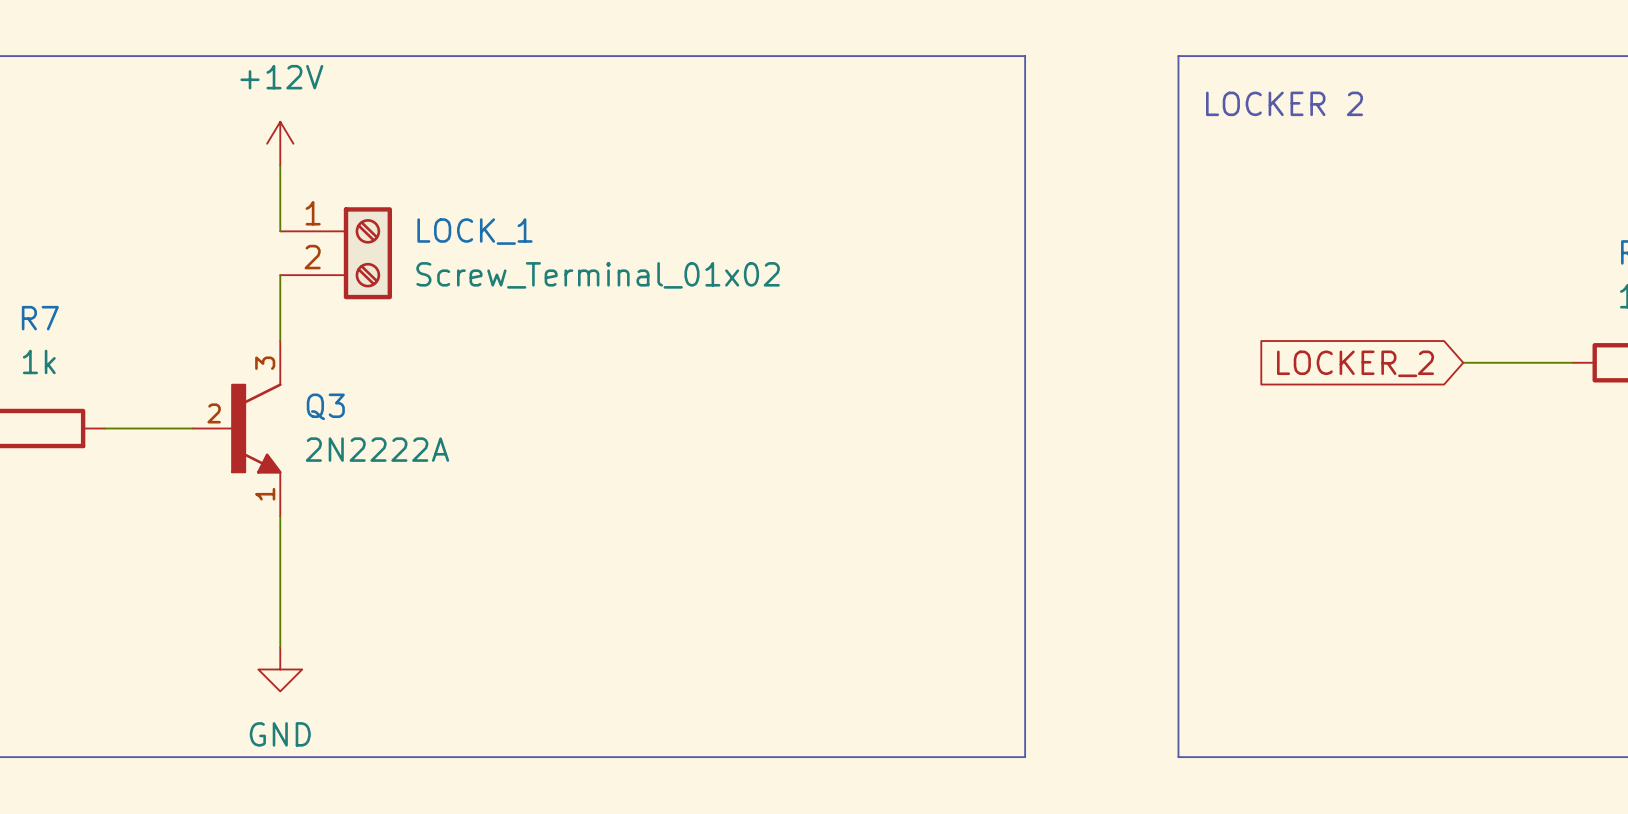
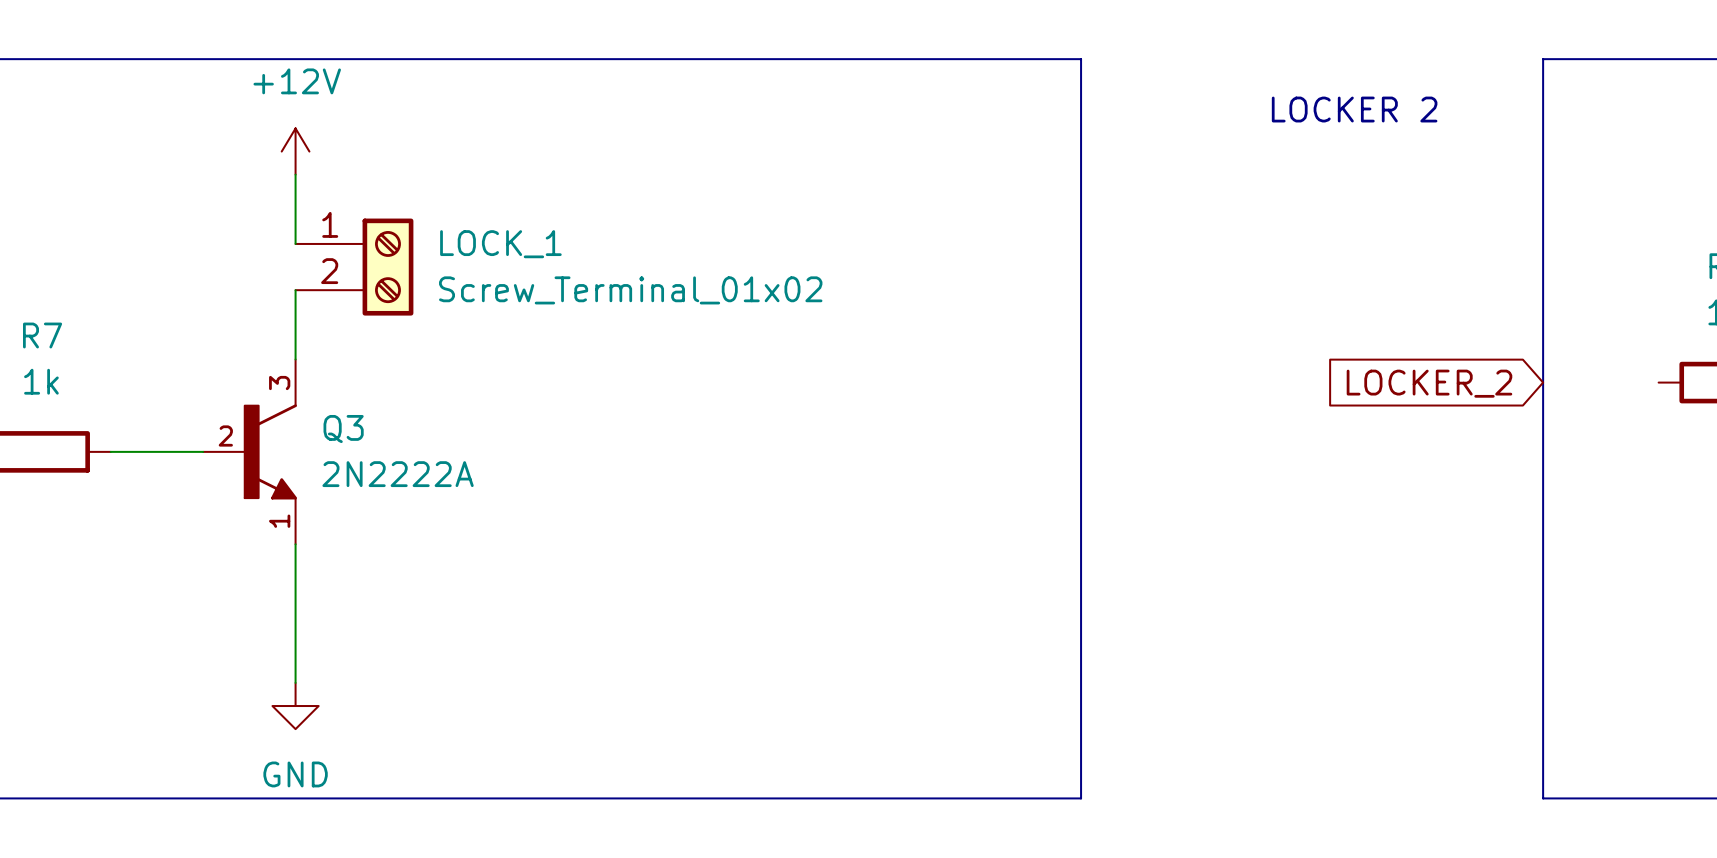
line: (1463, 56) (1178, 56) (1178, 757) (1463, 757) -> (1543, 59) (1543, 798)
wire: (1463, 362) (1572, 362) -> none

